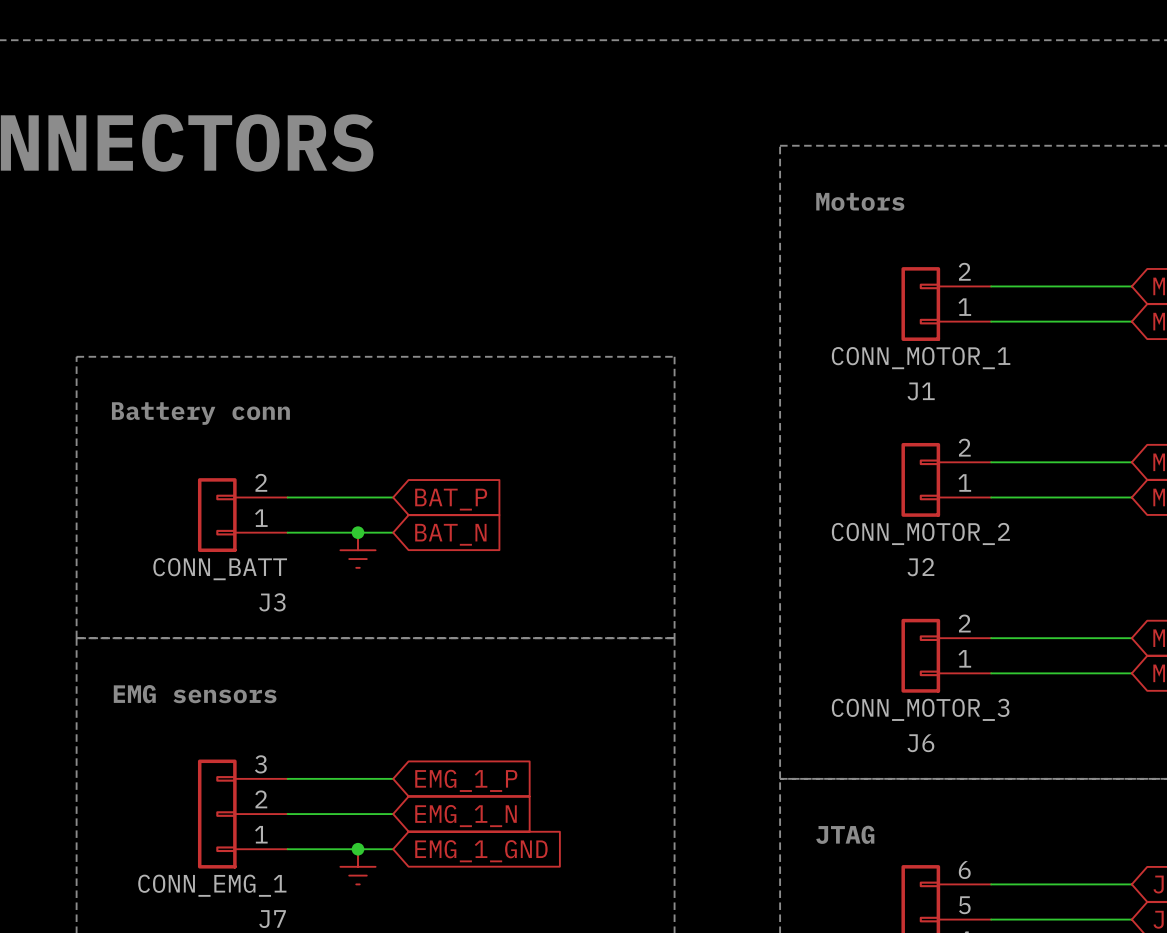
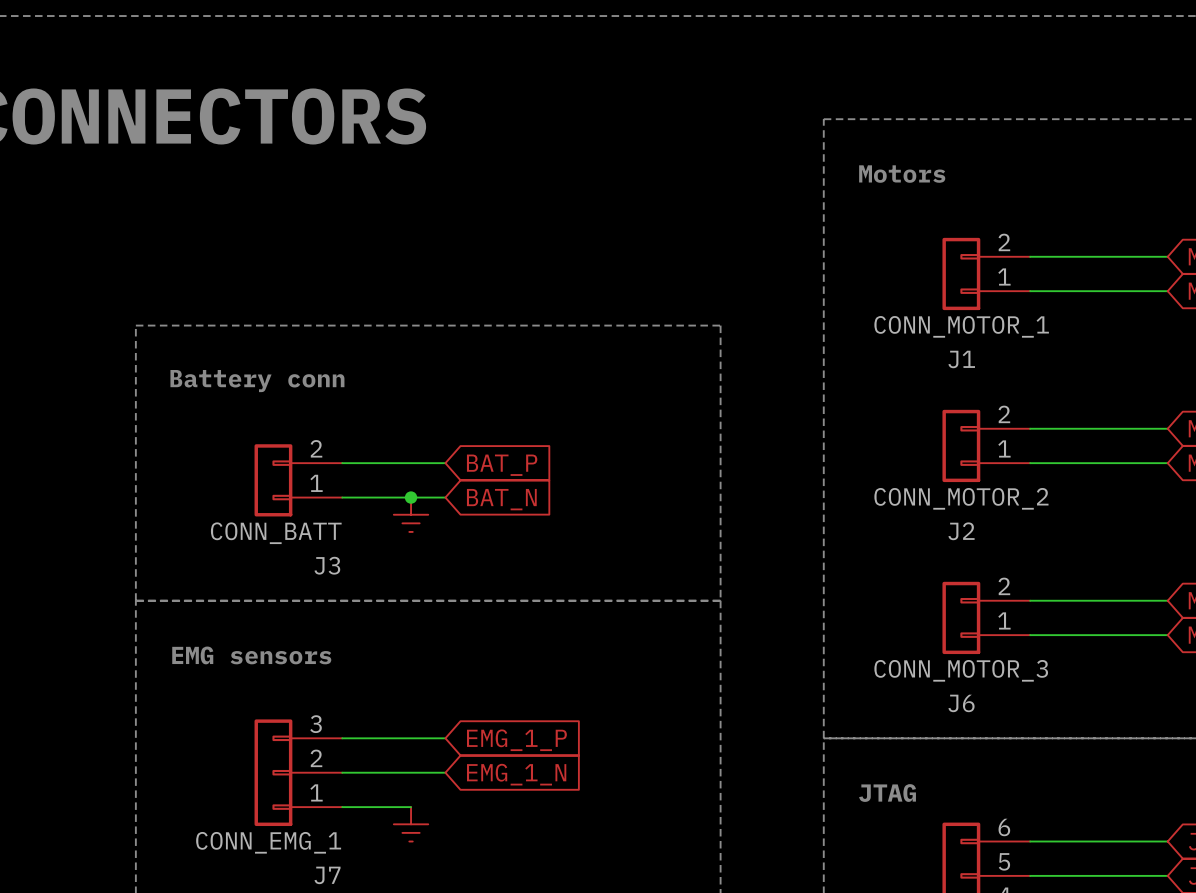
wire: (358, 849) (393, 849) -> none
junction: (358, 849) -> none
global label: EMG_1_GND (481, 851) -> none

